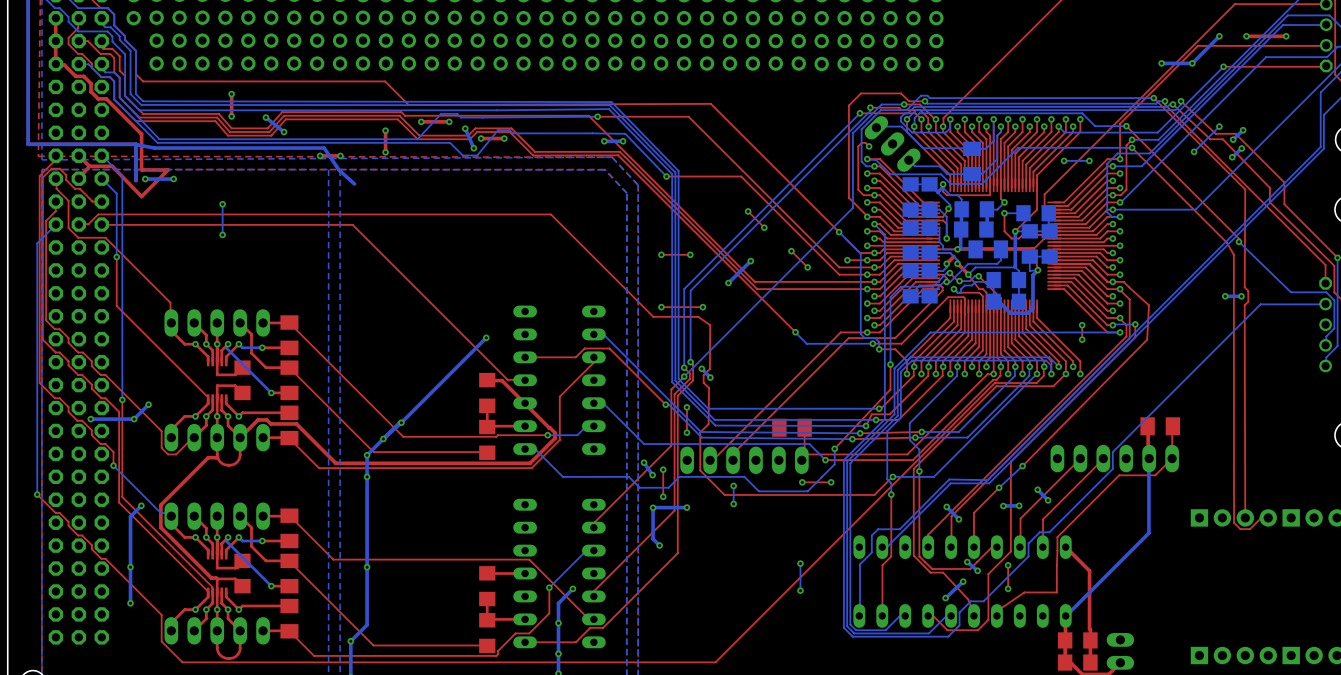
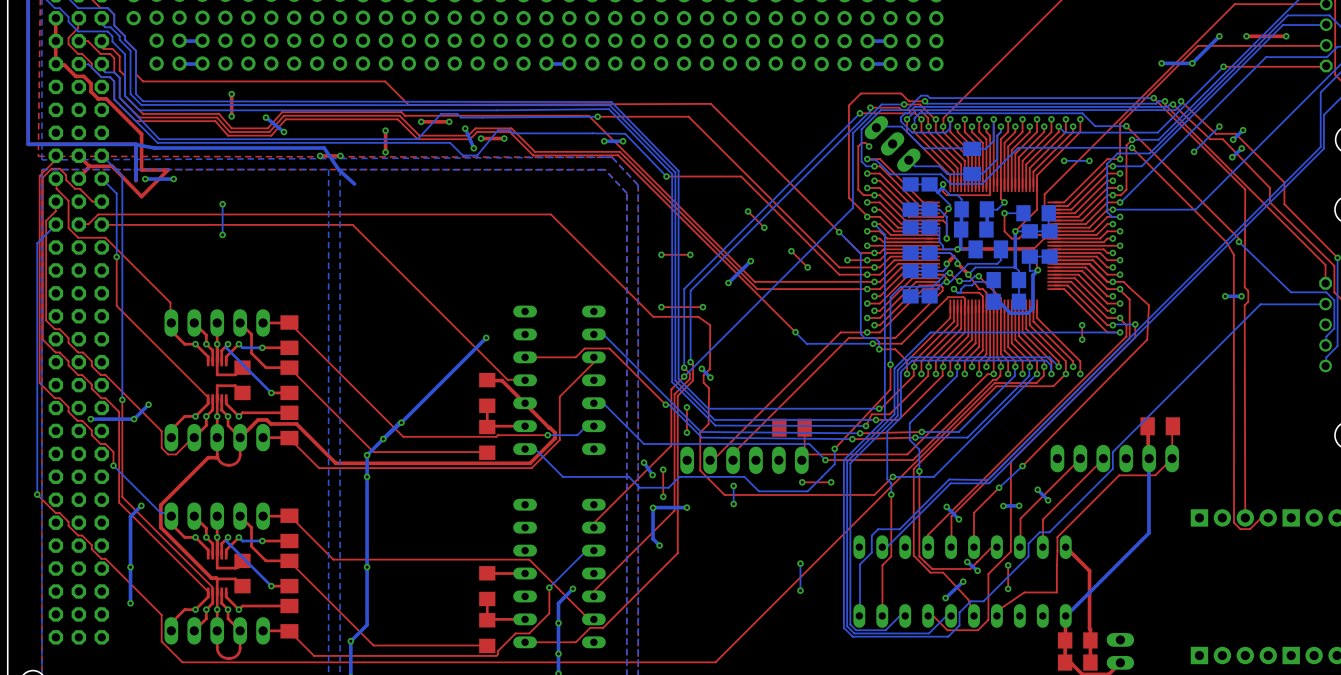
bottom track: none -> (202, 41) (179, 41)
bottom track: none -> (890, 41) (867, 41)
bottom track: none -> (202, 64) (179, 64)
bottom track: none -> (569, 64) (546, 64)
bottom track: none -> (890, 64) (867, 64)

